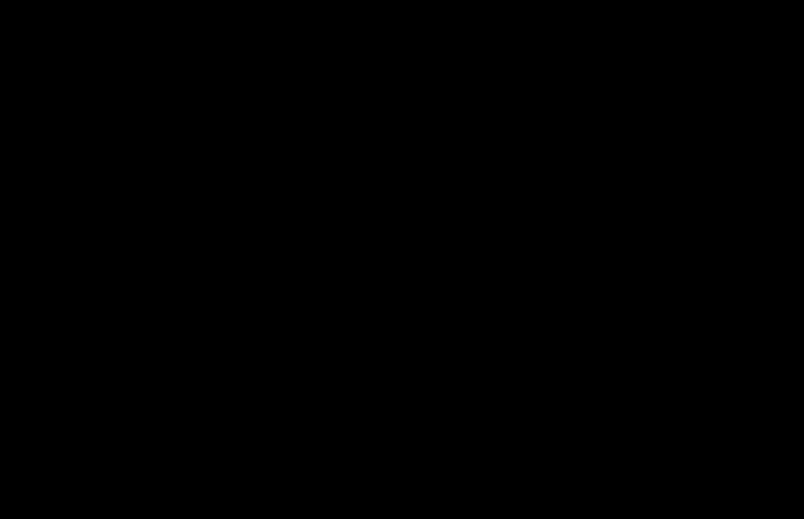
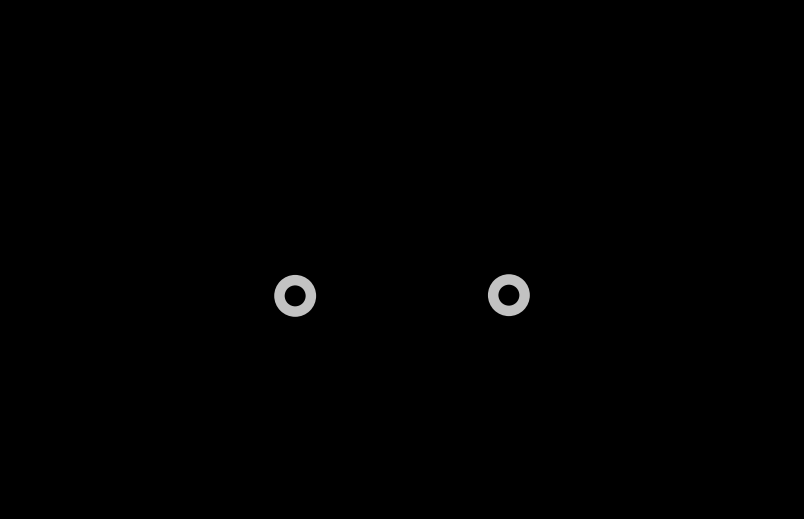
via: none -> (295, 295)
via: none -> (508, 295)

